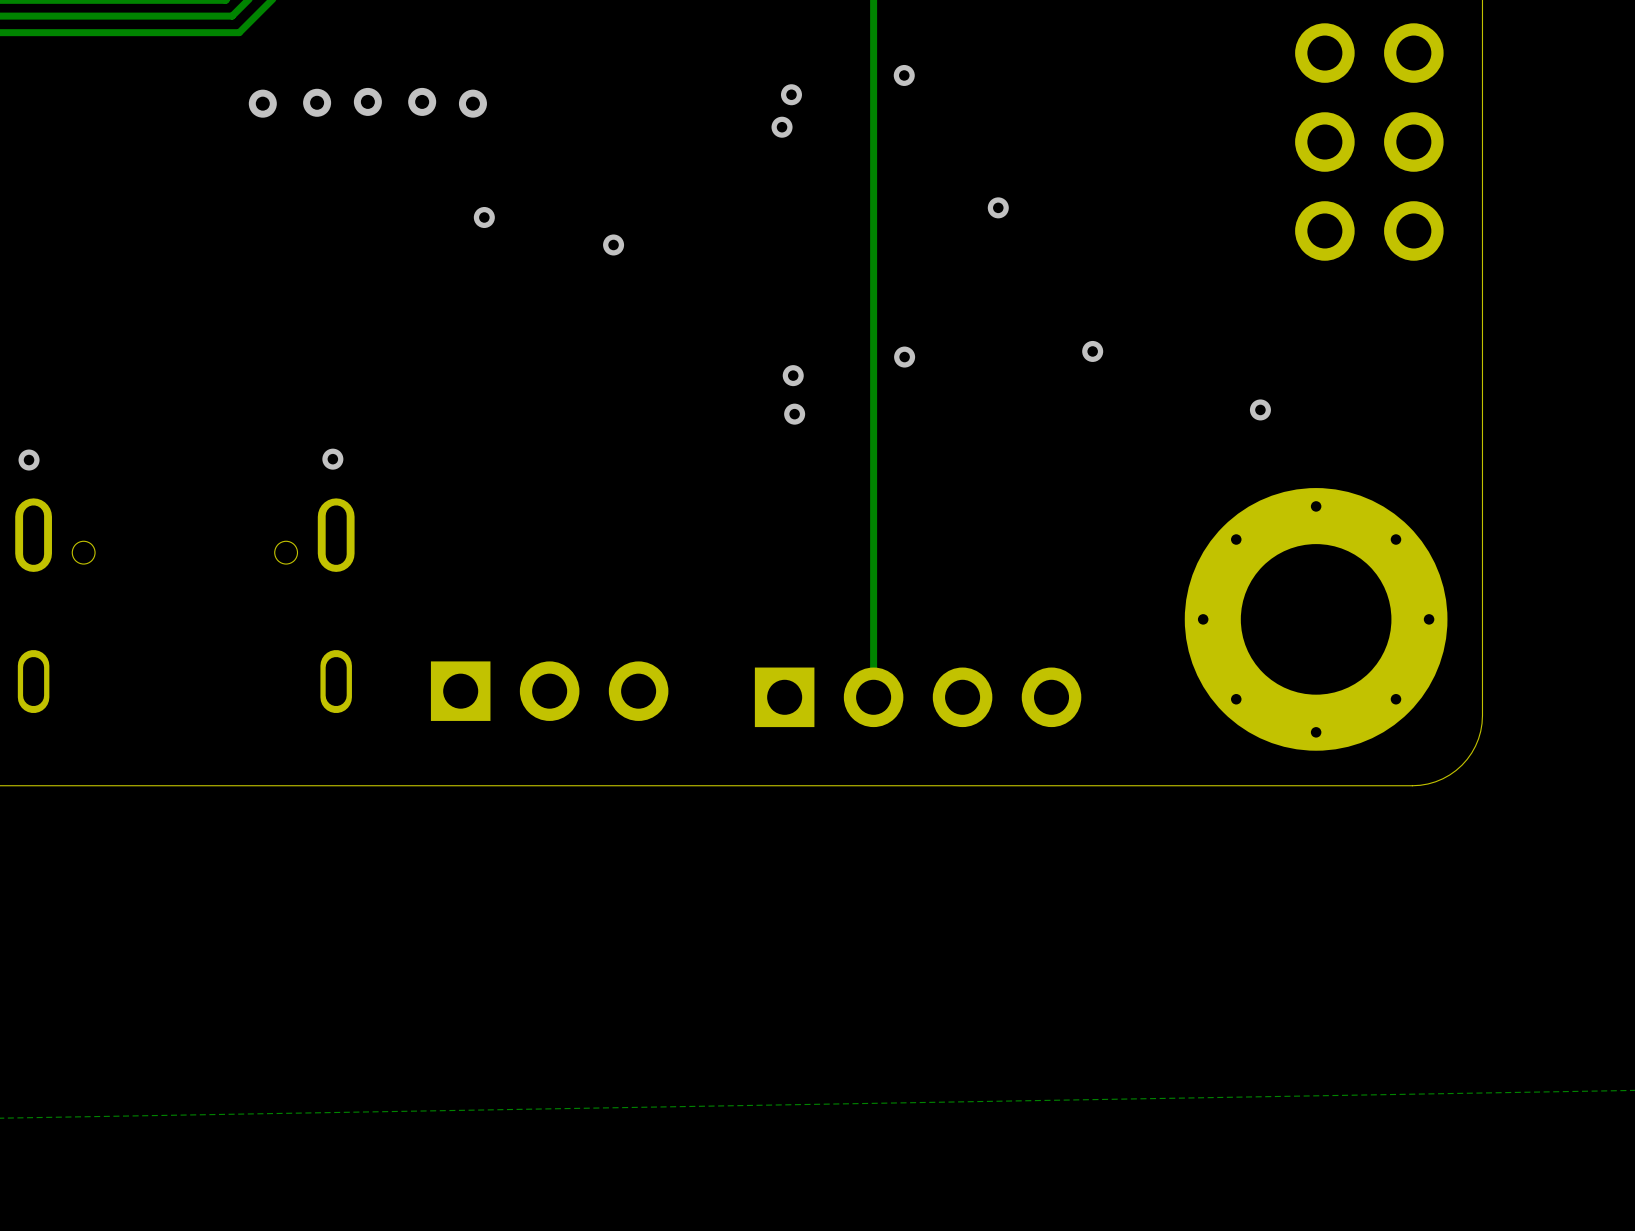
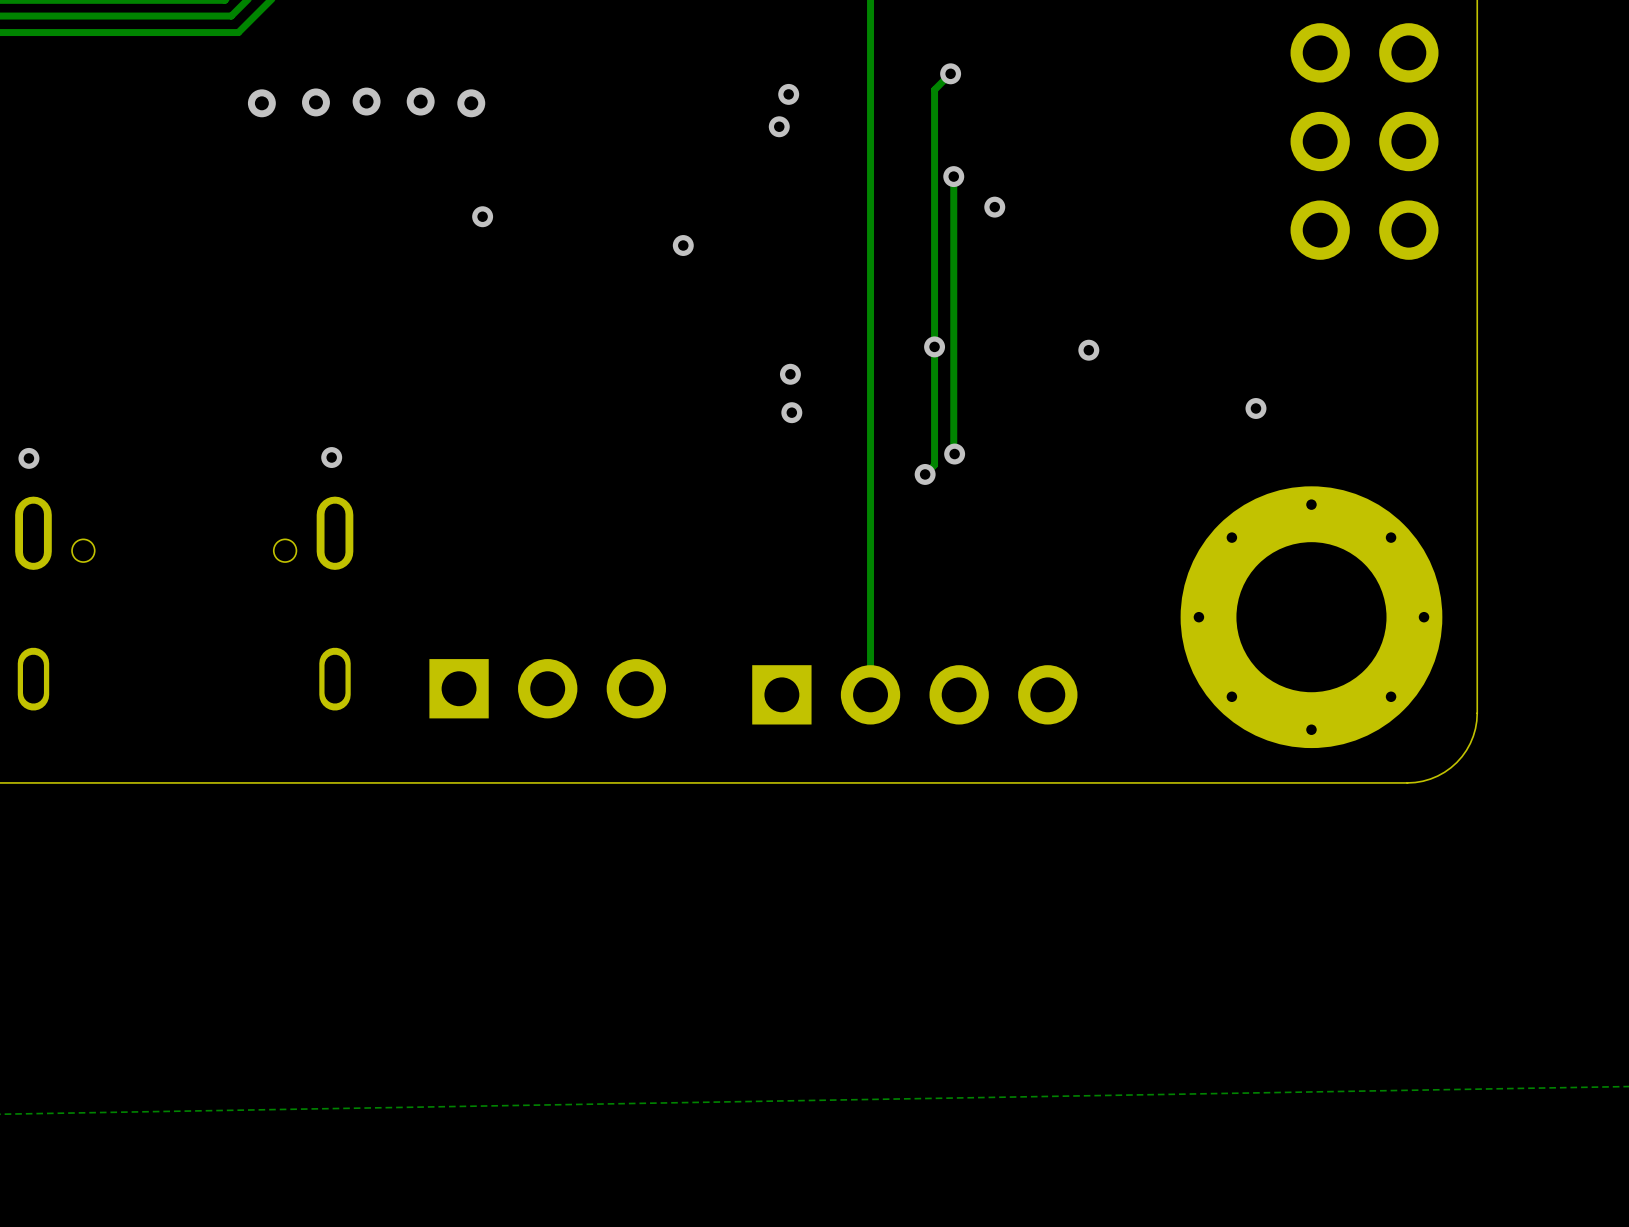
track: none -> (950, 73) (934, 89) (934, 465) (925, 474)
via position: (904, 75) -> (950, 73)
track: none -> (953, 176) (954, 454)
via: none -> (953, 176)
via position: (613, 244) -> (683, 245)
via position: (904, 357) -> (934, 346)
via: none -> (954, 454)
via: none -> (925, 474)

